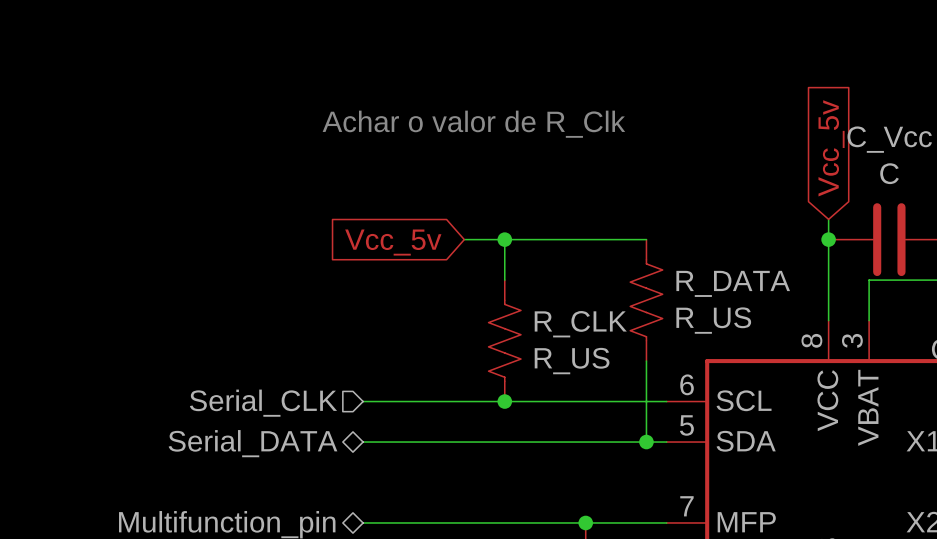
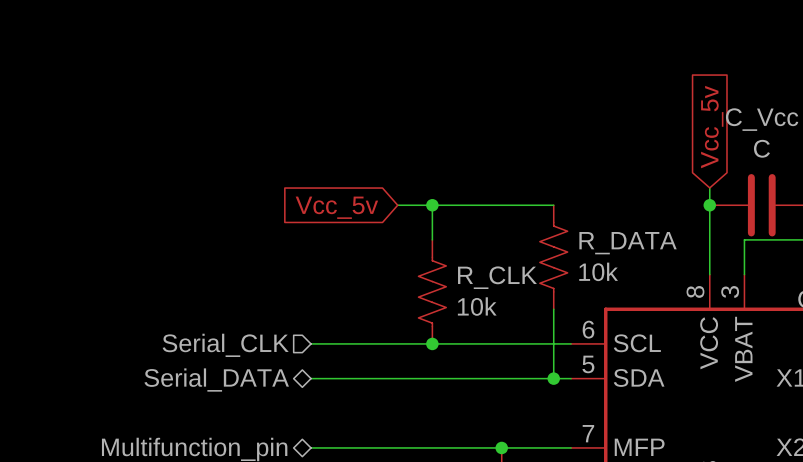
text: Achar o valor de R_Clk (473, 124) -> none
R_DATA value: R_US (713, 320) -> 10k (598, 271)
R_CLK value: R_US (572, 361) -> 10k (477, 306)

